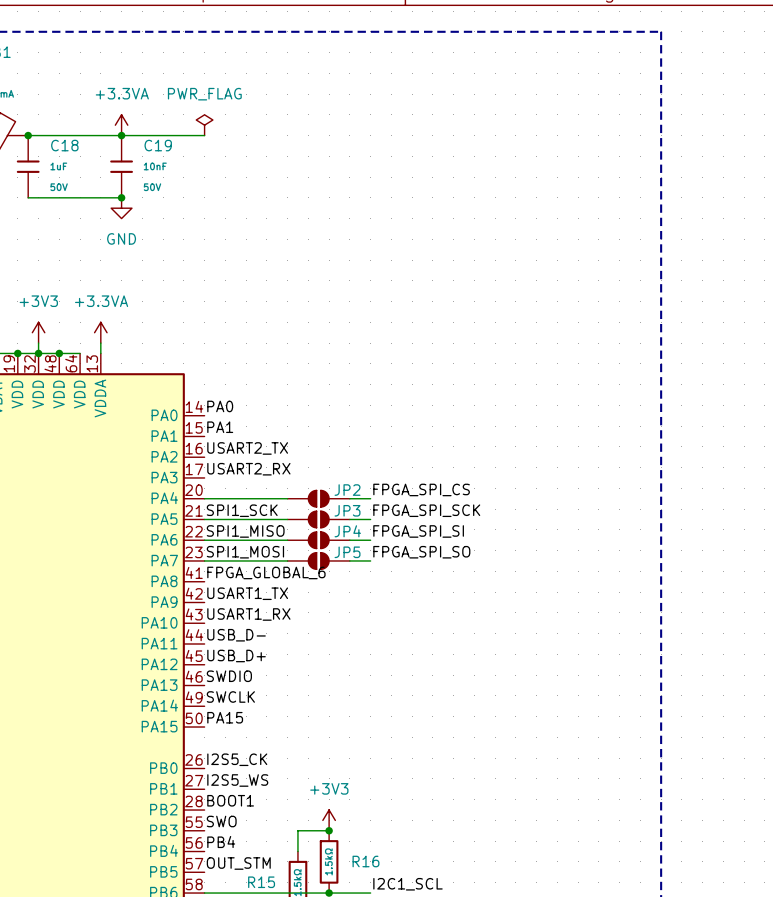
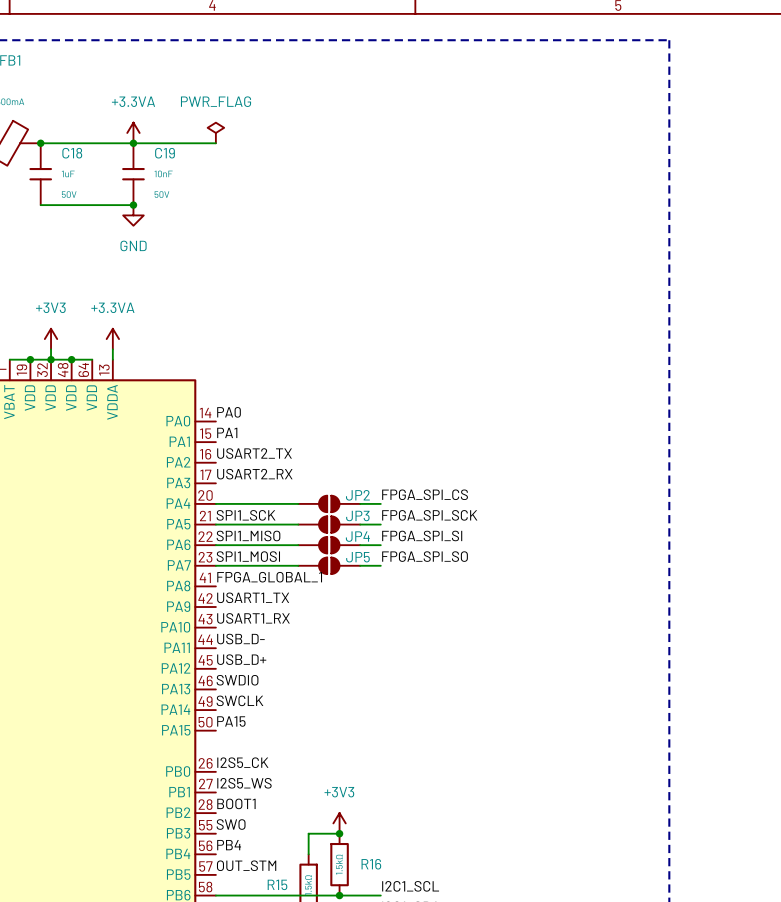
label: FPGA_GLOBAL_6 (266, 572) -> FPGA_GLOBAL_1 (269, 577)

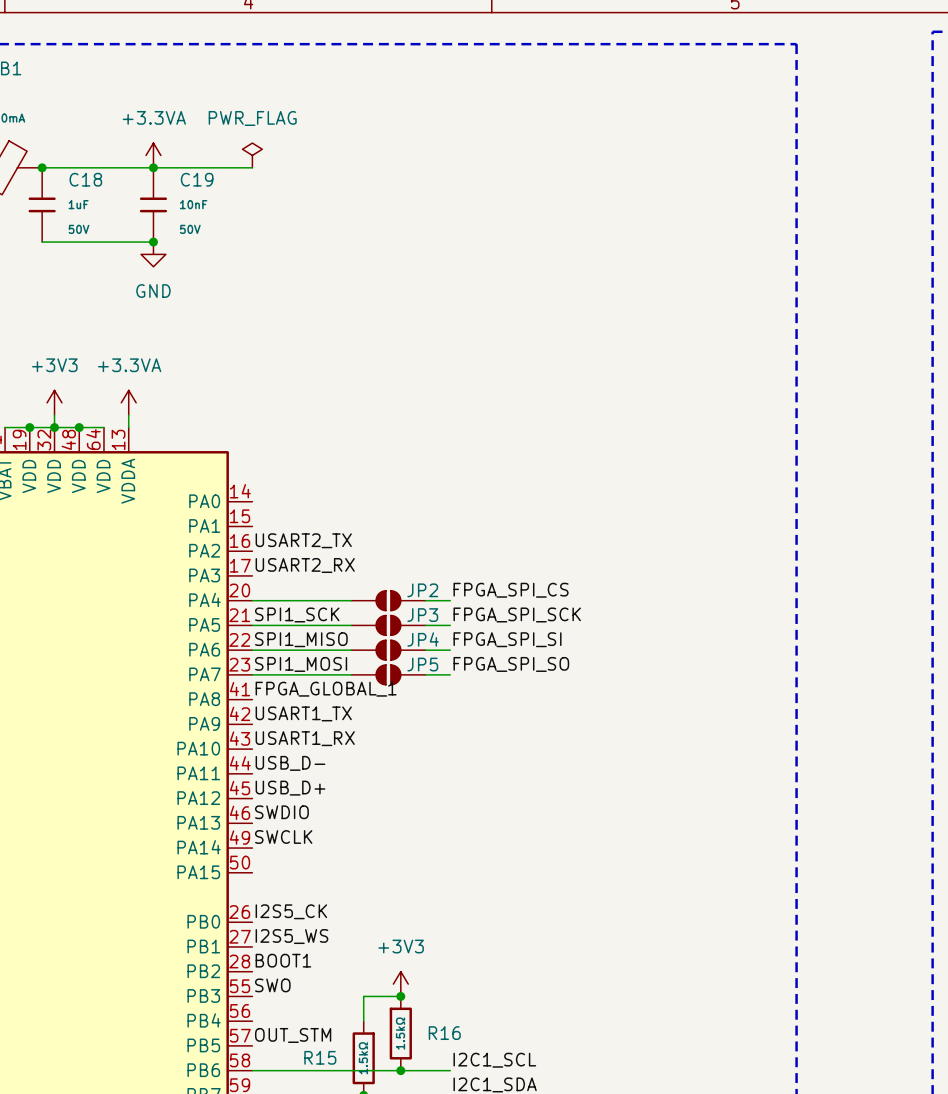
label: PA0 (229, 412) -> none
label: PA1 (227, 432) -> none
label: PA15 (231, 721) -> none
label: PB4 (229, 845) -> none

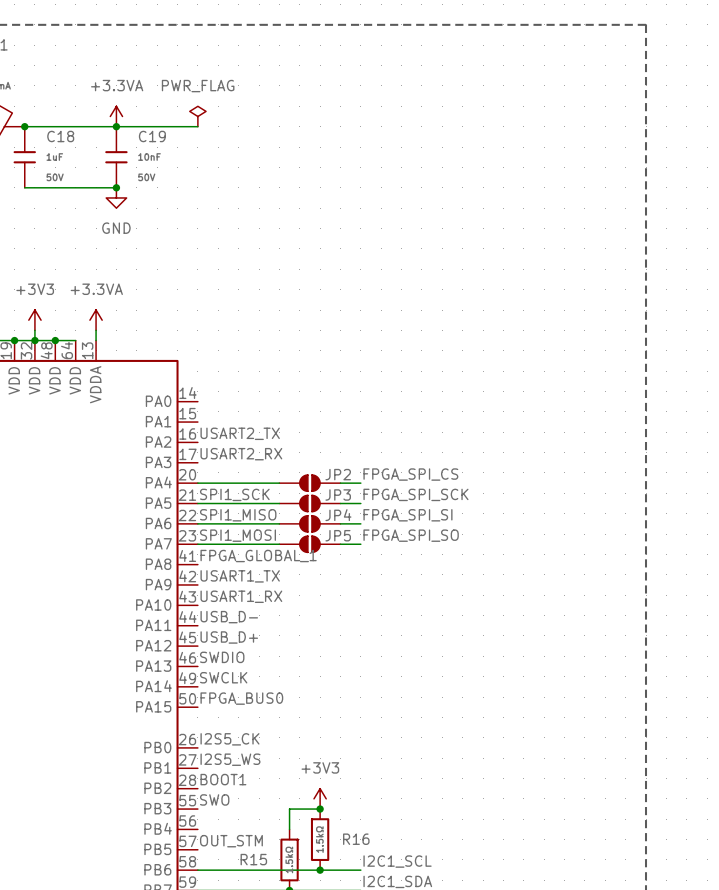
label: none -> FPGA_BUS0 (241, 698)

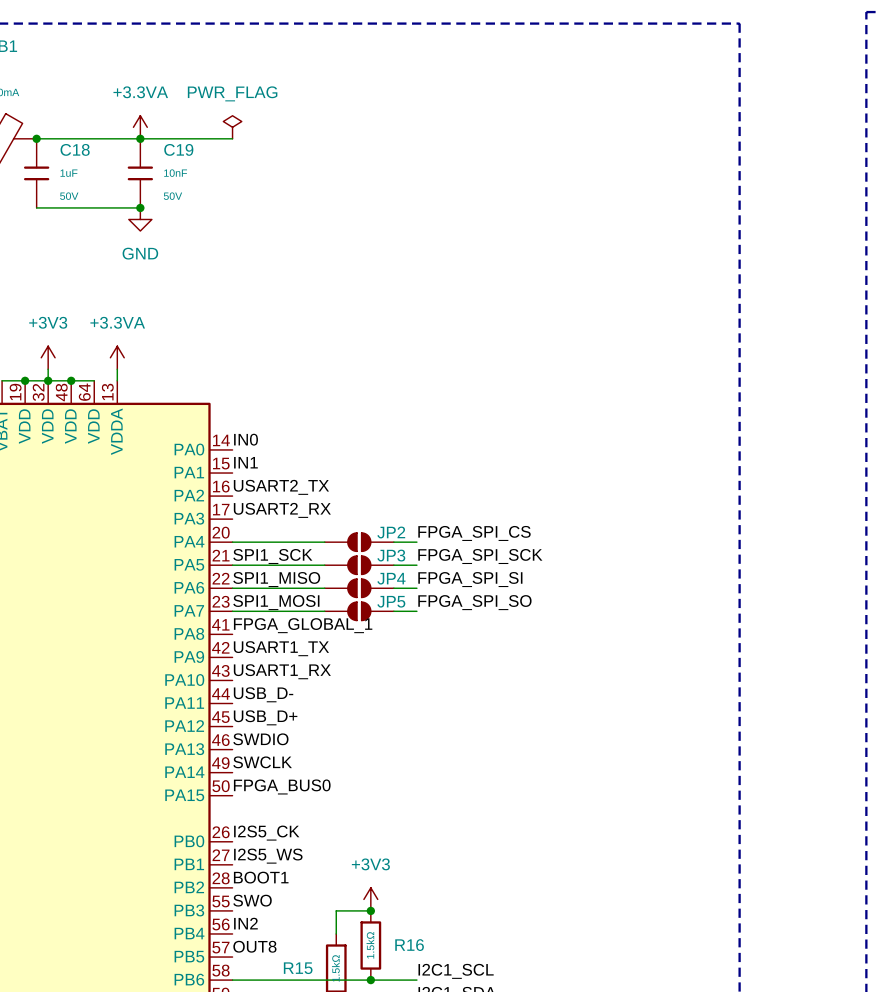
label: none -> IN0 (246, 439)
label: none -> IN1 (245, 462)
label: none -> IN2 (245, 923)
label: OUT_STM (231, 841) -> OUT8 (254, 946)

